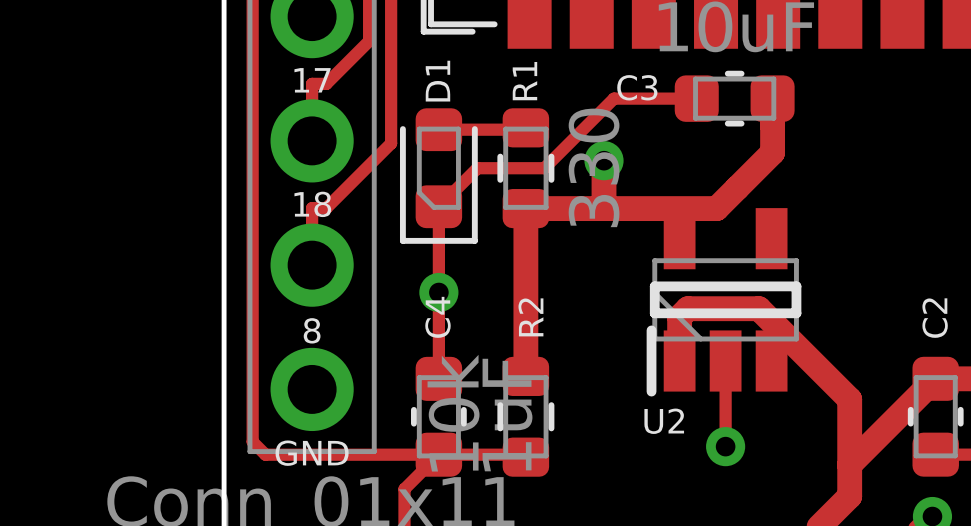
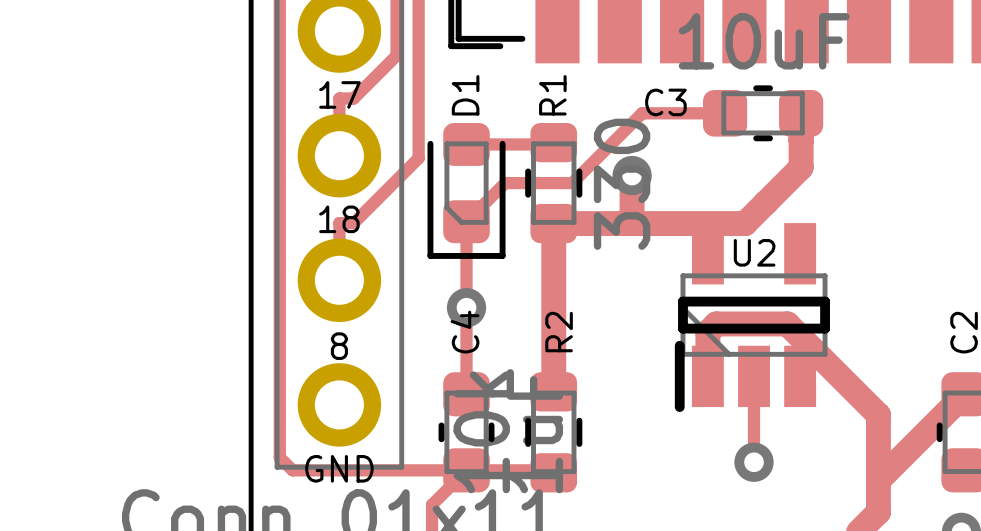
U2 name position: U2 (664, 421) -> U2 (754, 252)

